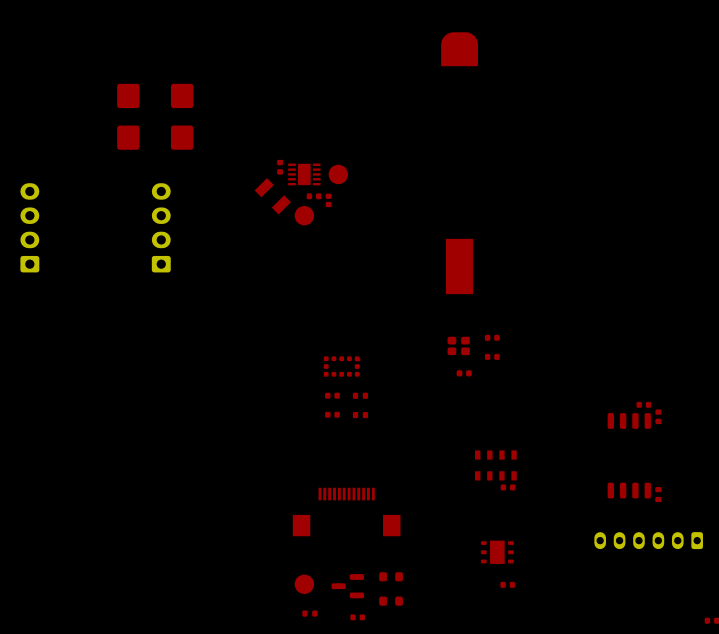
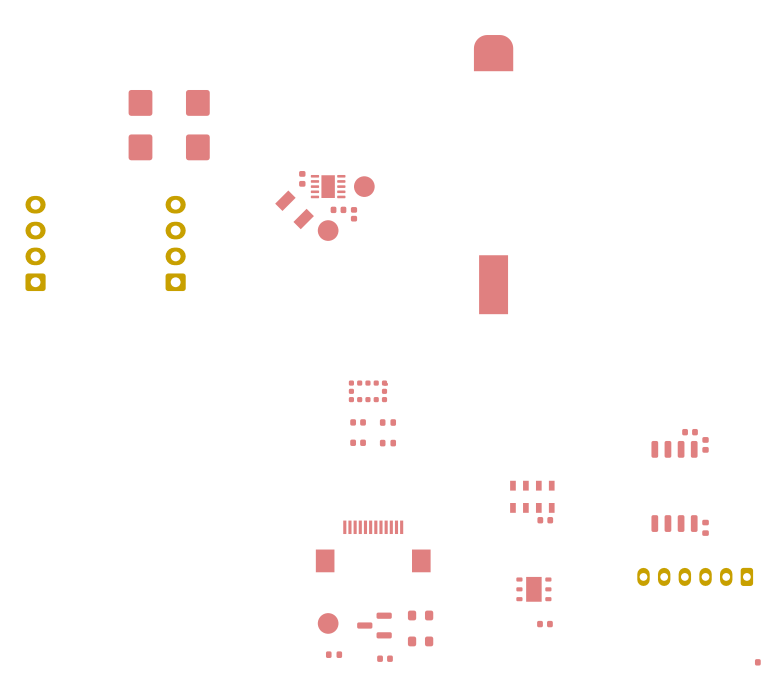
part: (492, 337) -> none
part: (458, 345) -> none
part: (492, 356) -> none
part: (464, 373) -> none

